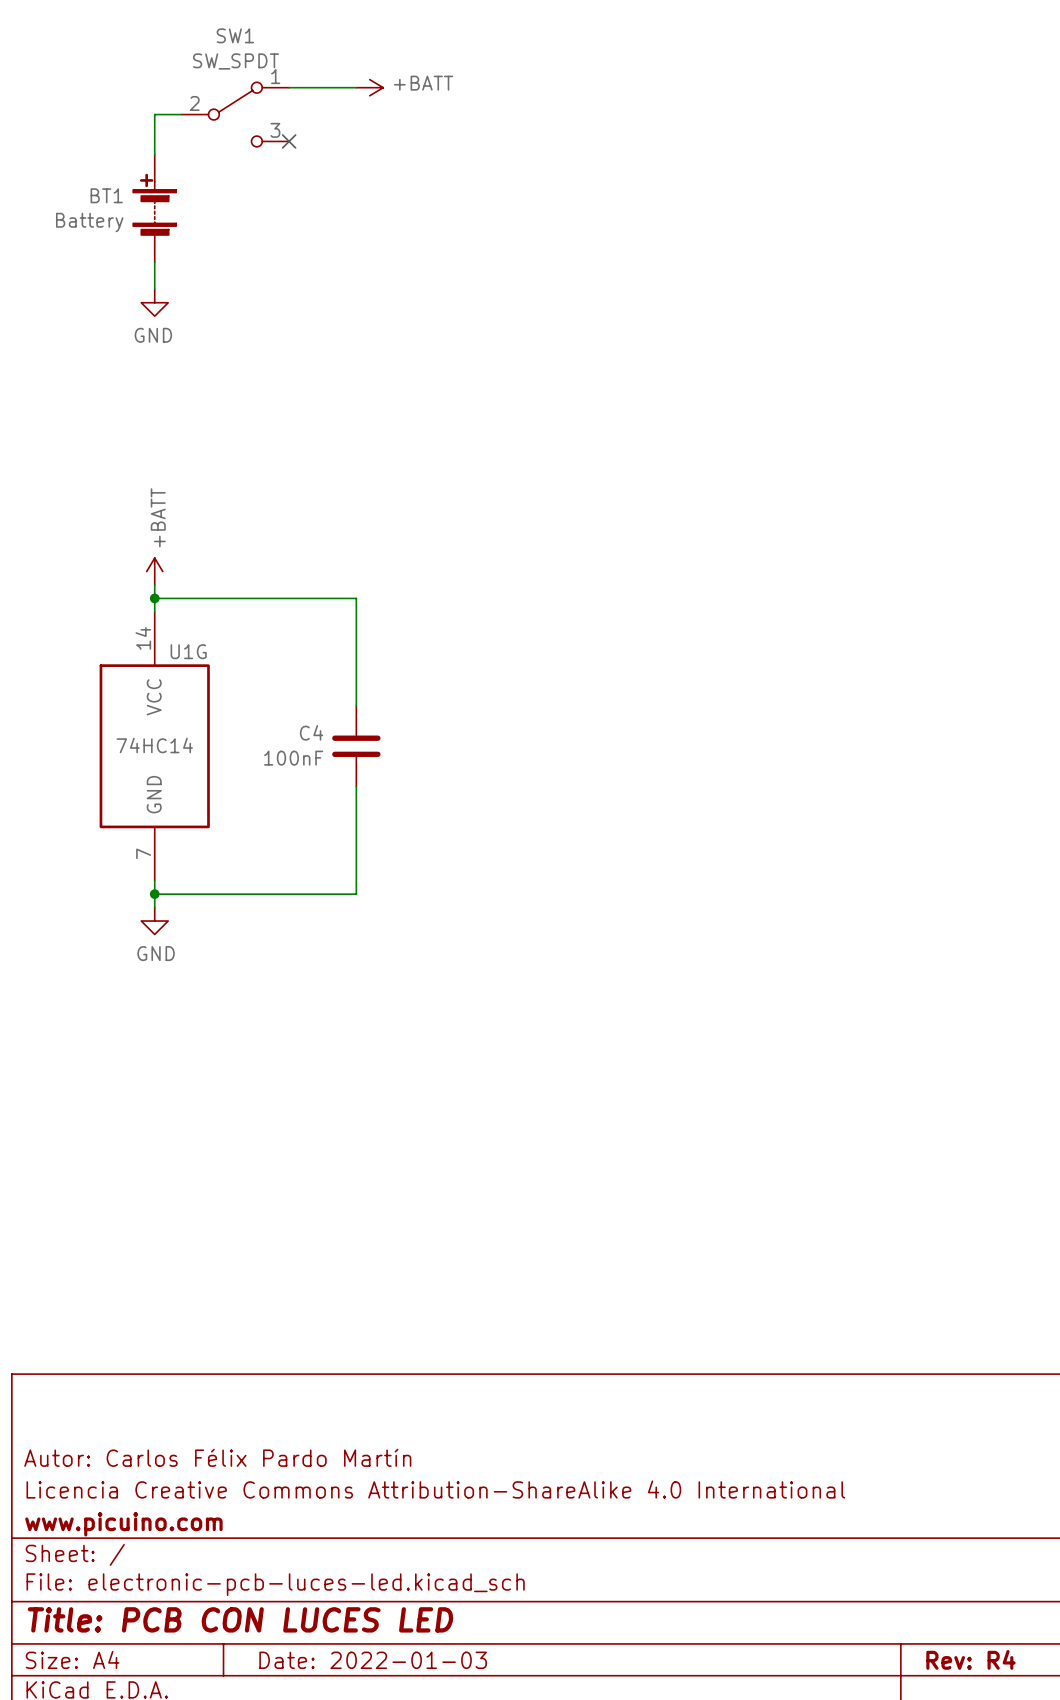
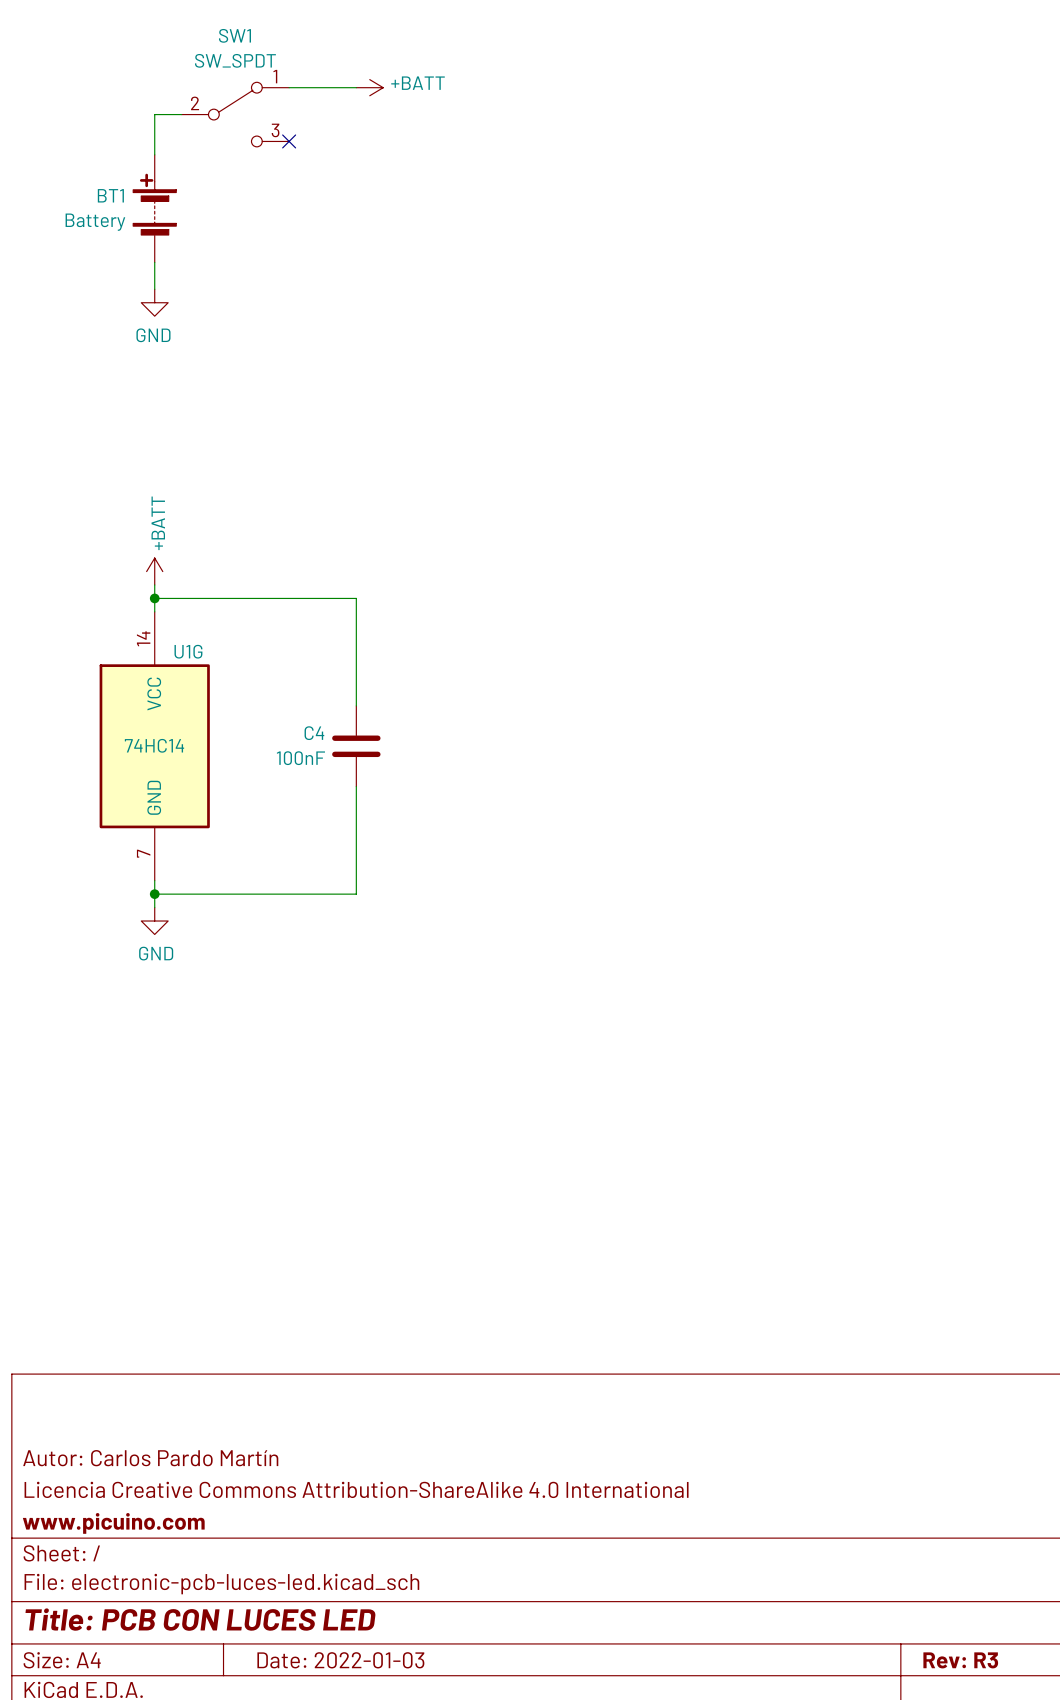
title block: Autor: Carlos Félix Pardo Martín (217, 1457) -> Autor: Carlos Pardo Martín (150, 1458)
title block: Rev: R4 (970, 1659) -> Rev: R3 (960, 1660)

